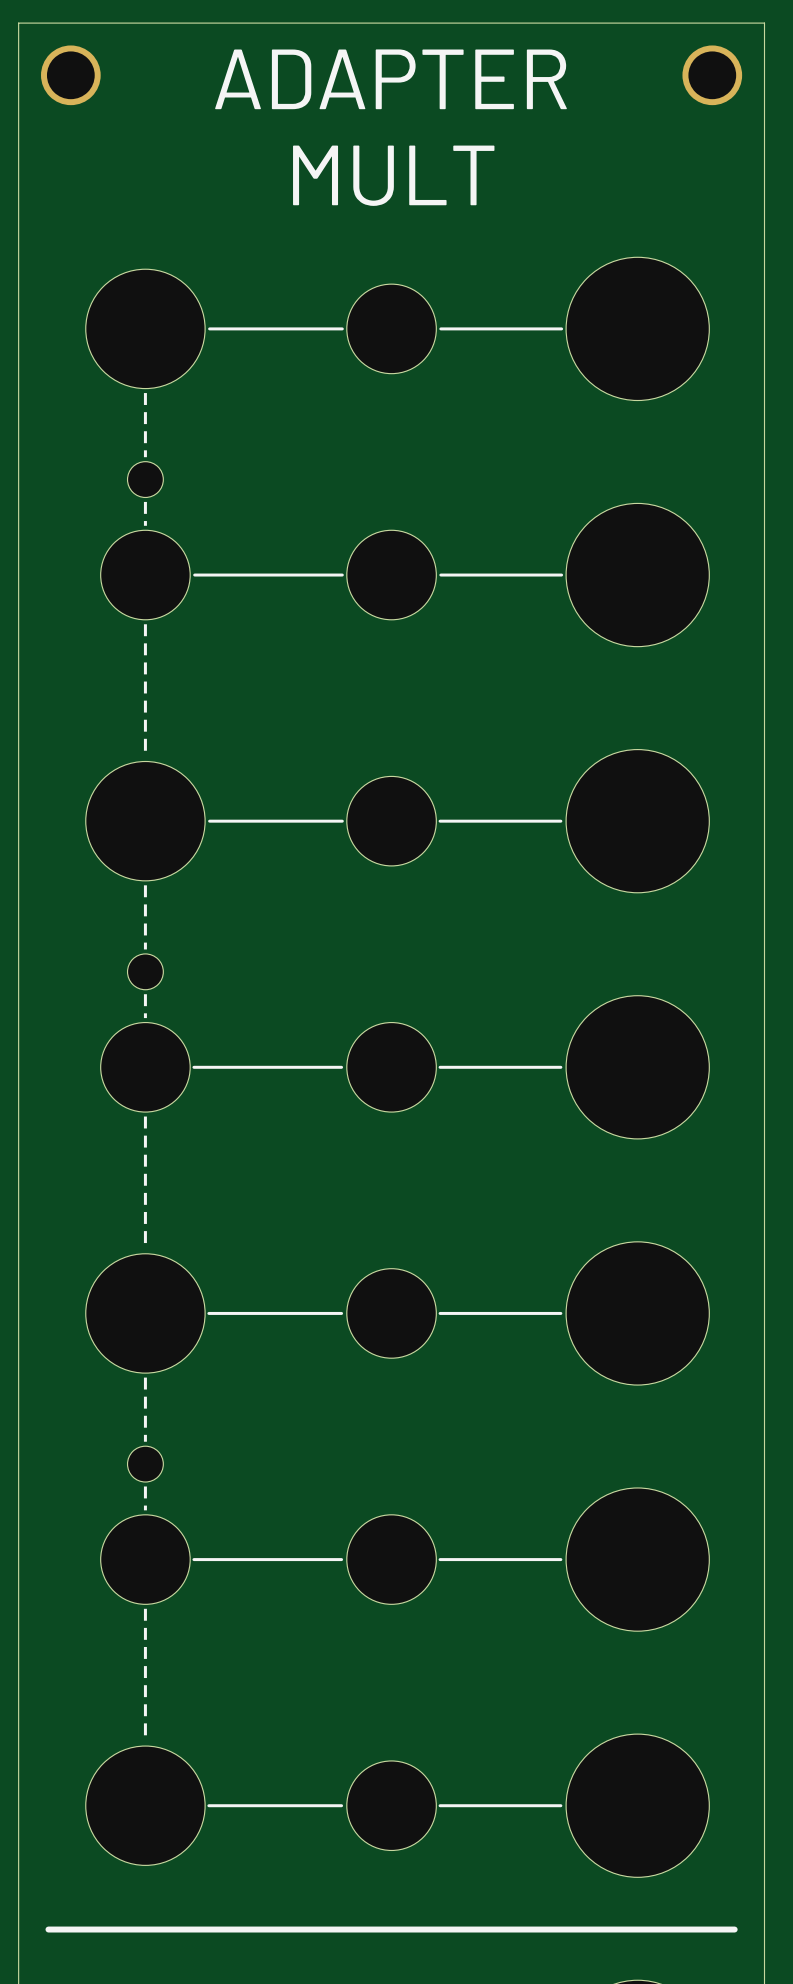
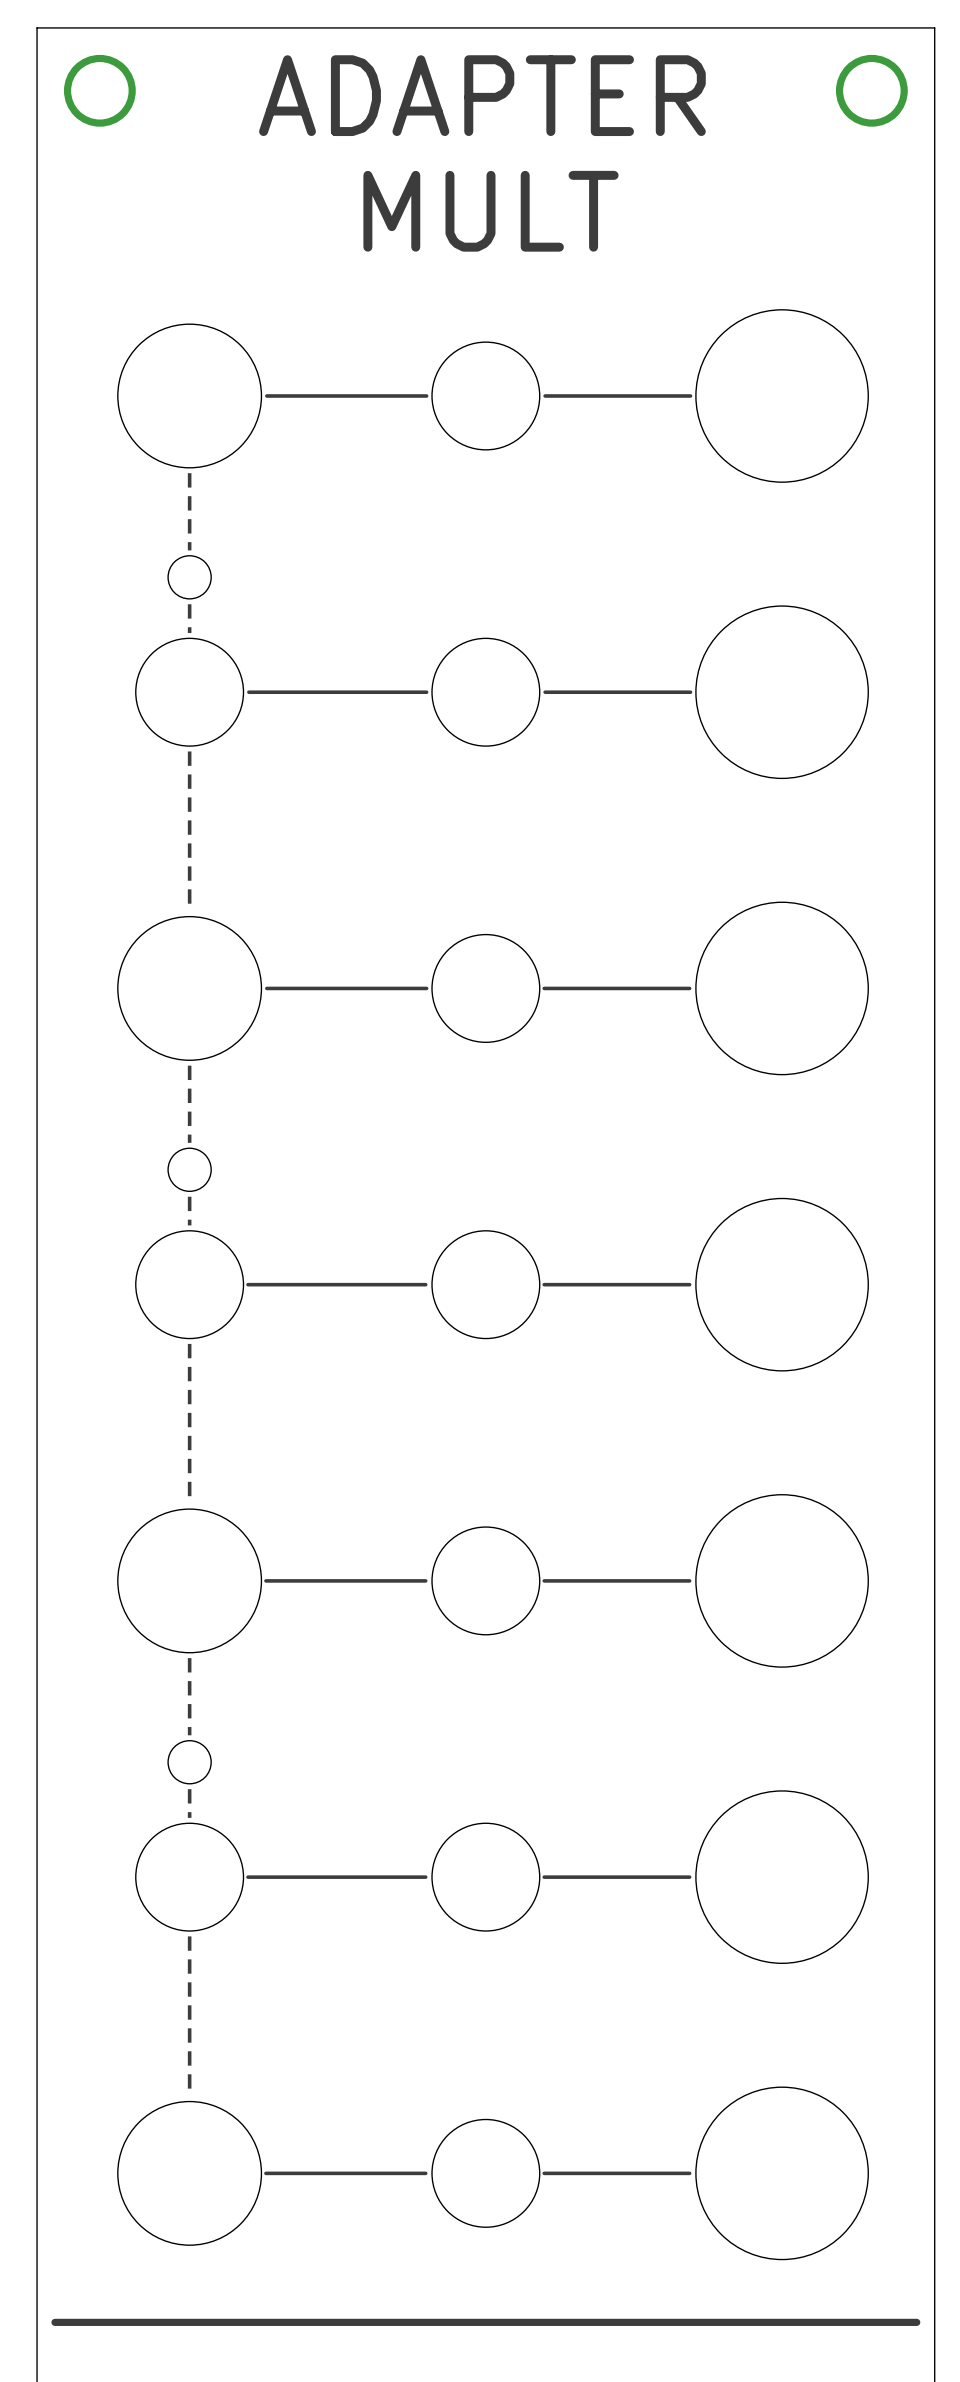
line: none -> (54, 2322) (72, 2322)
line: none -> (898, 2322) (916, 2322)

